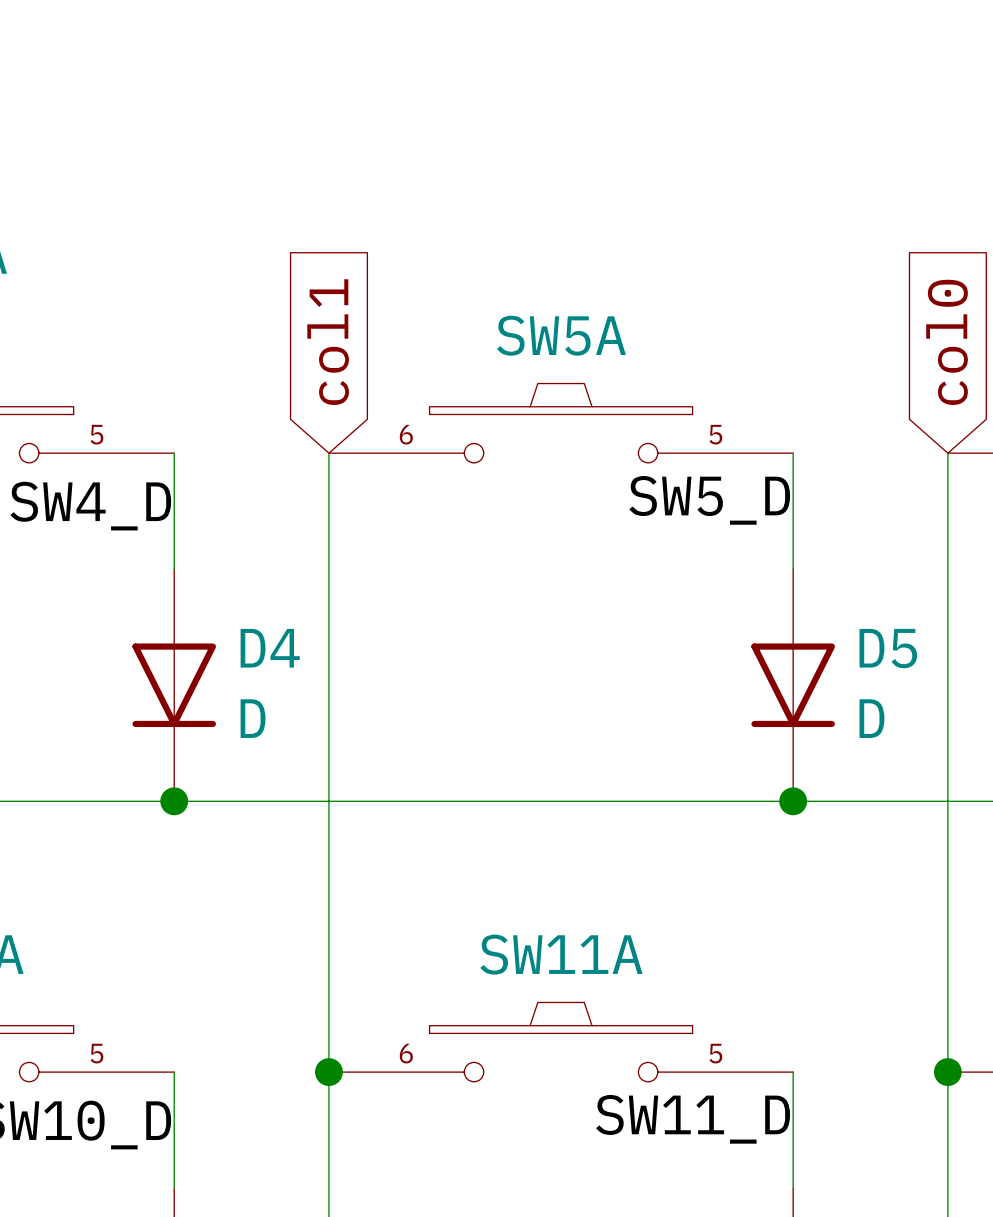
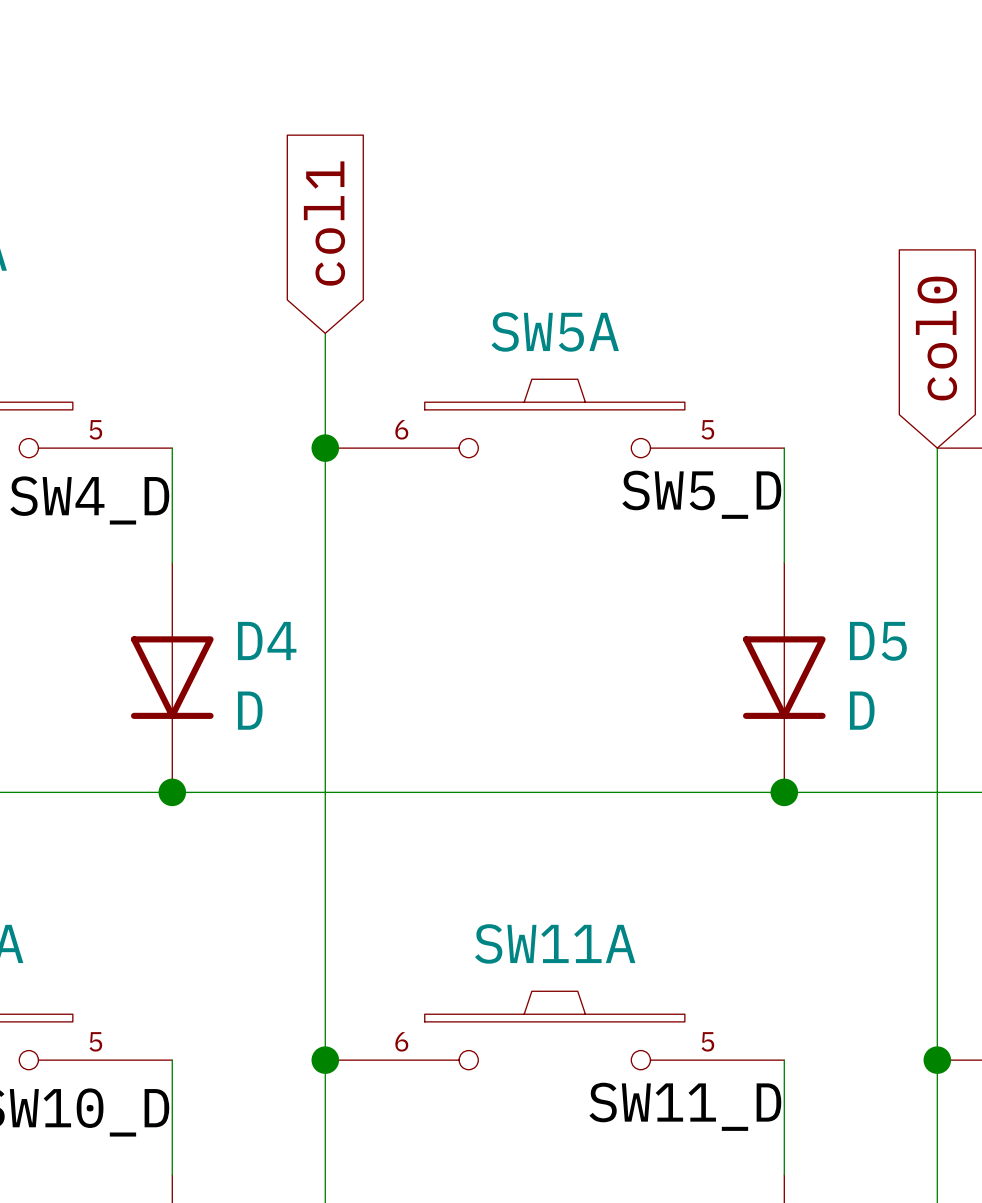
wire: none -> (325, 333) (325, 448)
global label position: col1 (328, 342) -> col1 (324, 223)
junction: none -> (325, 448)

